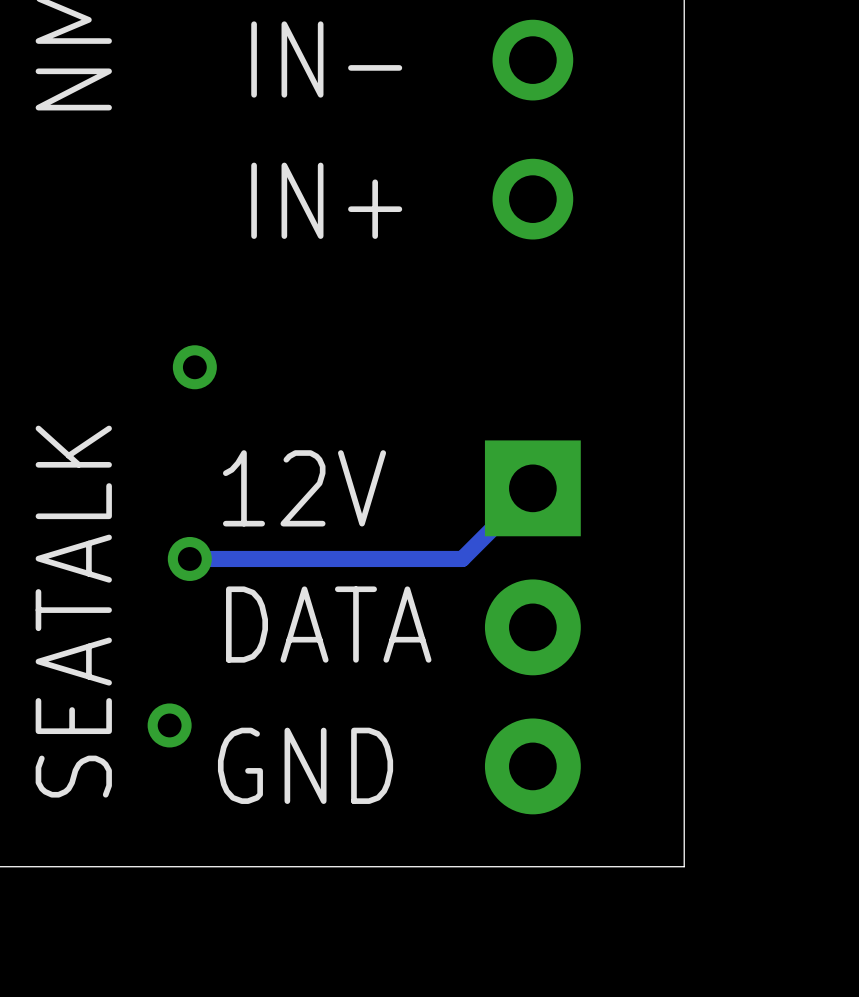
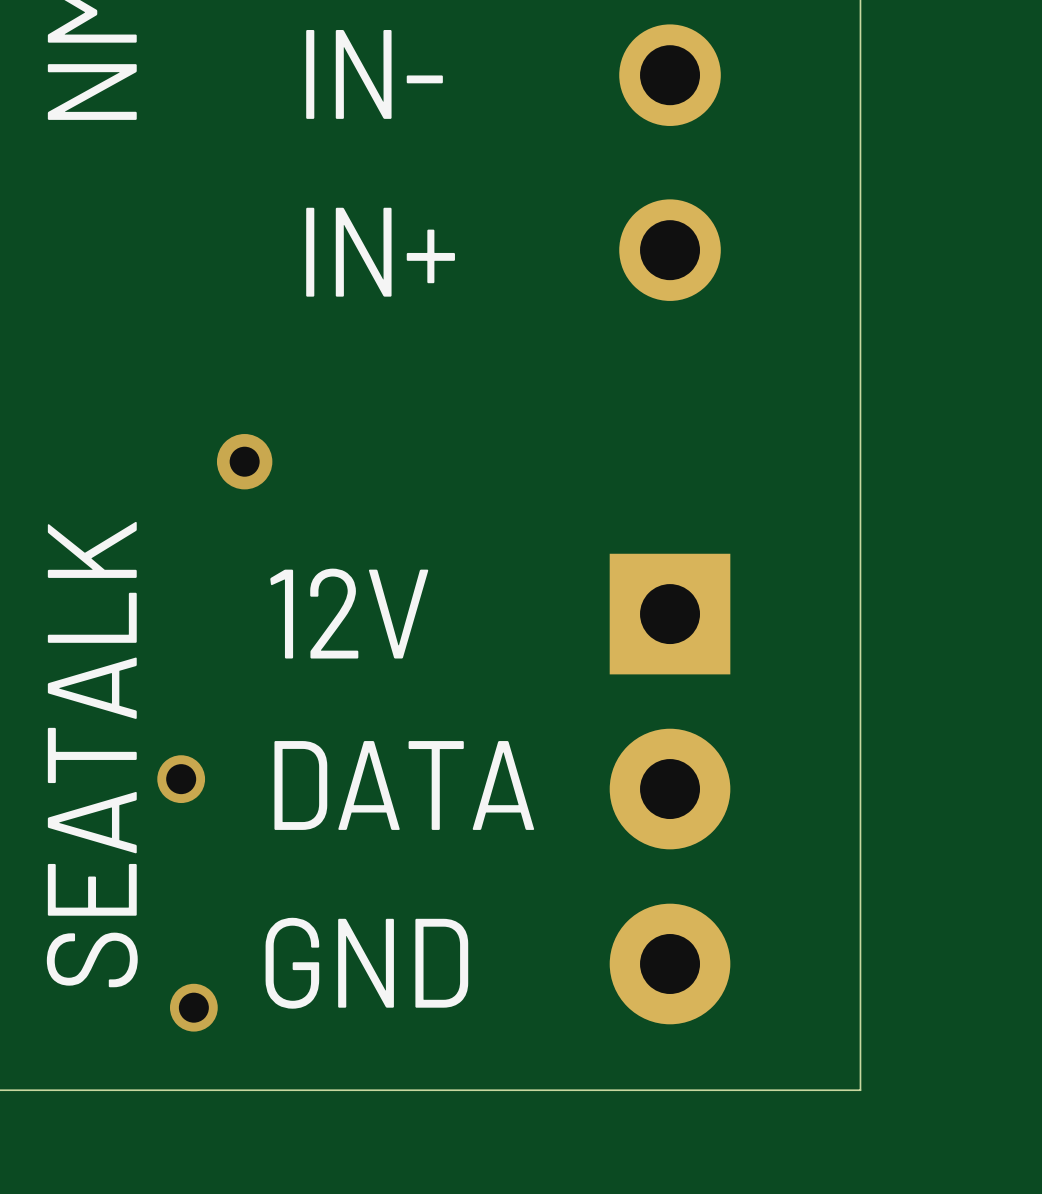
track: (532, 488) (462, 558) (189, 558) -> none
via: (189, 558) -> none
via: none -> (181, 779)
via: (169, 725) -> none
via: none -> (193, 1007)

